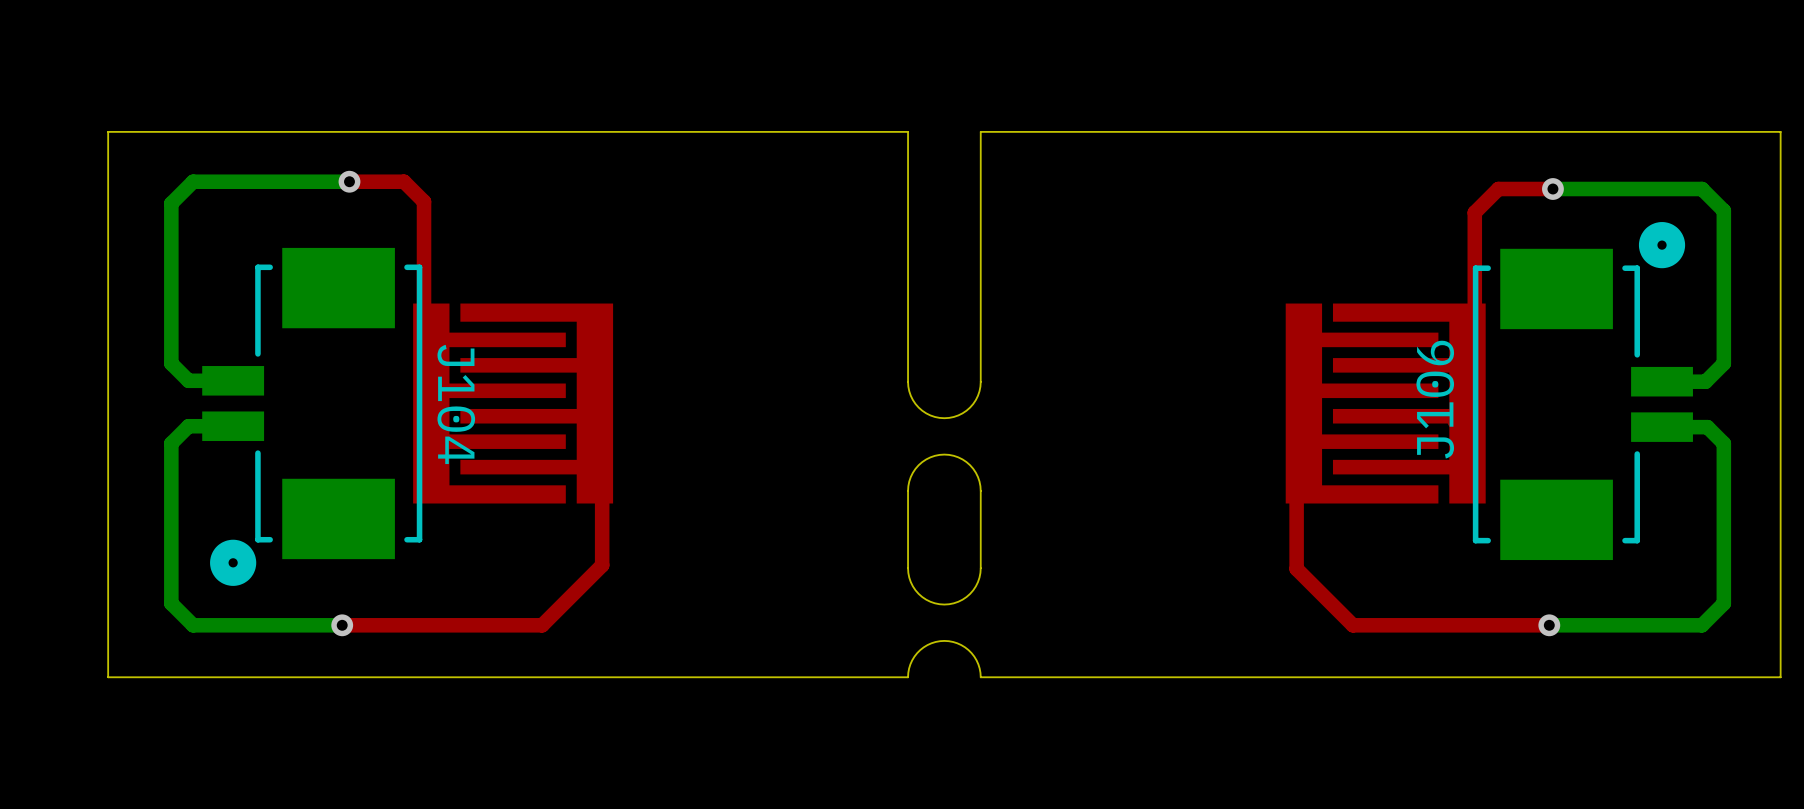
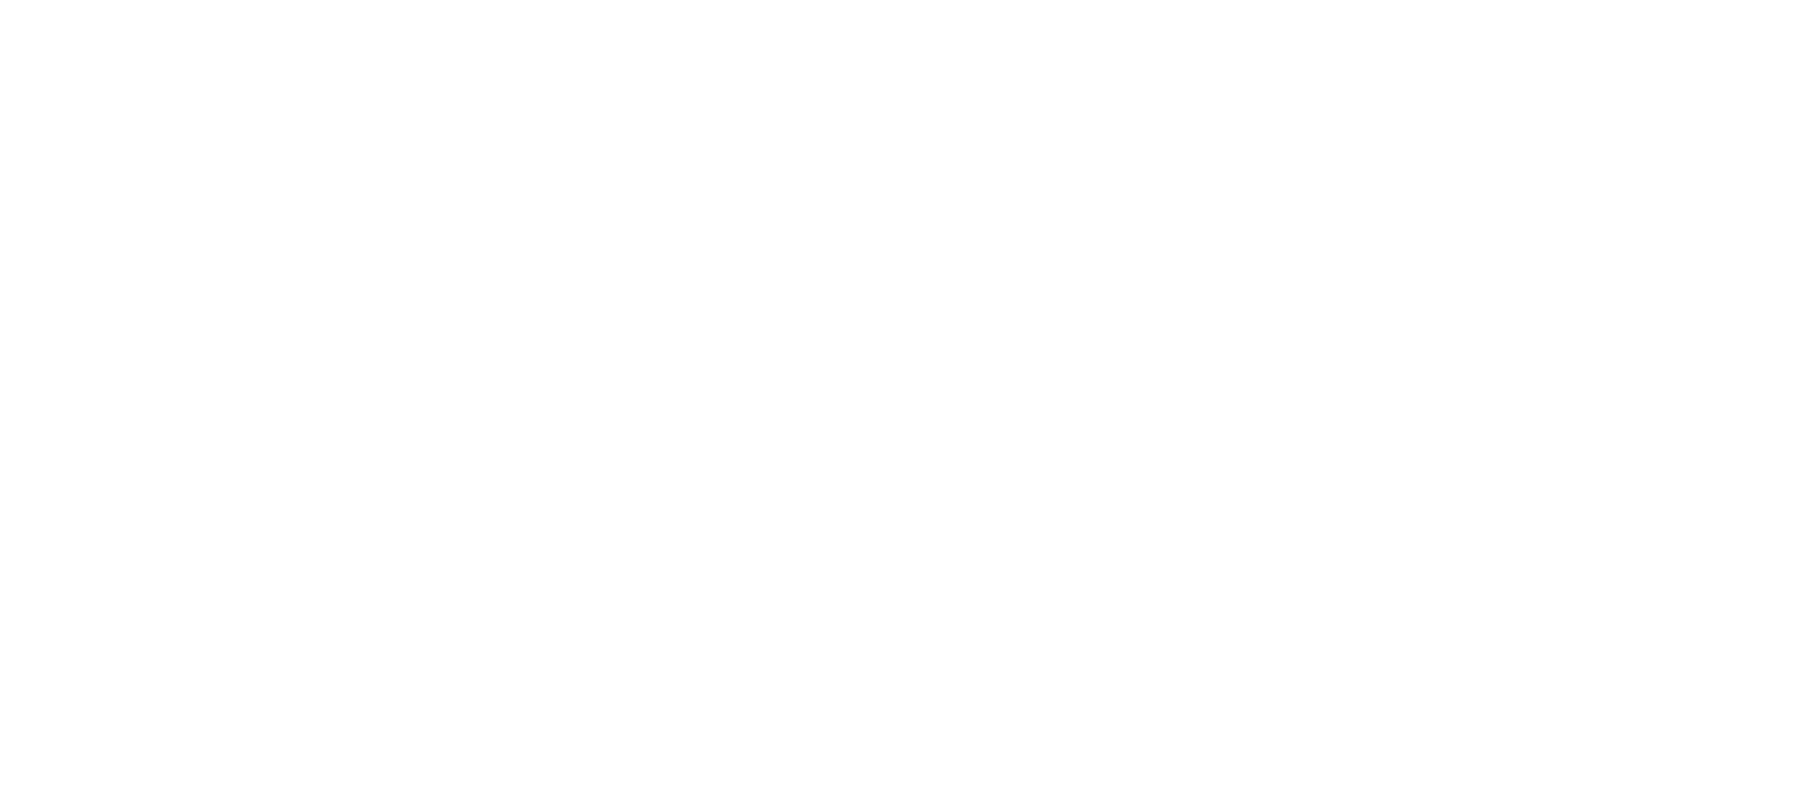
board edge: (1780, 131) (980, 131) (980, 386) (975, 400) (966, 410) (958, 415) (944, 418) (930, 415) (922, 410) (912, 400) (908, 386) (908, 131) (108, 131) (108, 677) (908, 677) (912, 660) (920, 650) (931, 643) (944, 640) (957, 643) (968, 650) (976, 660) (980, 677) (1780, 677) (1780, 131) -> none
top track: (349, 181) (404, 181) (424, 201) (424, 405) (440, 421) -> none
bottom track: (349, 181) (193, 181) (171, 203) (171, 363) (188, 380) (240, 380) -> none
via: (349, 181) -> none
top track: (1552, 189) (1498, 189) (1474, 212) (1474, 401) (1454, 421) (1465, 432) -> none
bottom track: (1552, 189) (1702, 189) (1723, 210) (1723, 363) (1705, 381) (1658, 381) -> none
via: (1552, 189) -> none
J106: (1582, 391) -> none
top track: (602, 401) (602, 565) (542, 625) (342, 625) -> none
part: (513, 403) -> none
part: (1385, 403) -> none
top track: (1296, 405) (1296, 568) (1352, 625) (1549, 625) -> none
J104: (312, 416) -> none
bottom track: (240, 426) (188, 426) (171, 443) (171, 603) (193, 625) (342, 625) -> none
bottom track: (1658, 427) (1707, 427) (1723, 443) (1723, 603) (1702, 625) (1549, 625) -> none
board edge: (980, 490) (980, 568) (977, 582) (970, 593) (958, 601) (944, 604) (930, 601) (915, 590) (908, 572) (908, 490) (910, 477) (918, 465) (926, 459) (939, 454) (949, 454) (962, 459) (970, 465) (977, 477) (980, 490) -> none
via: (342, 625) -> none
via: (1549, 625) -> none

